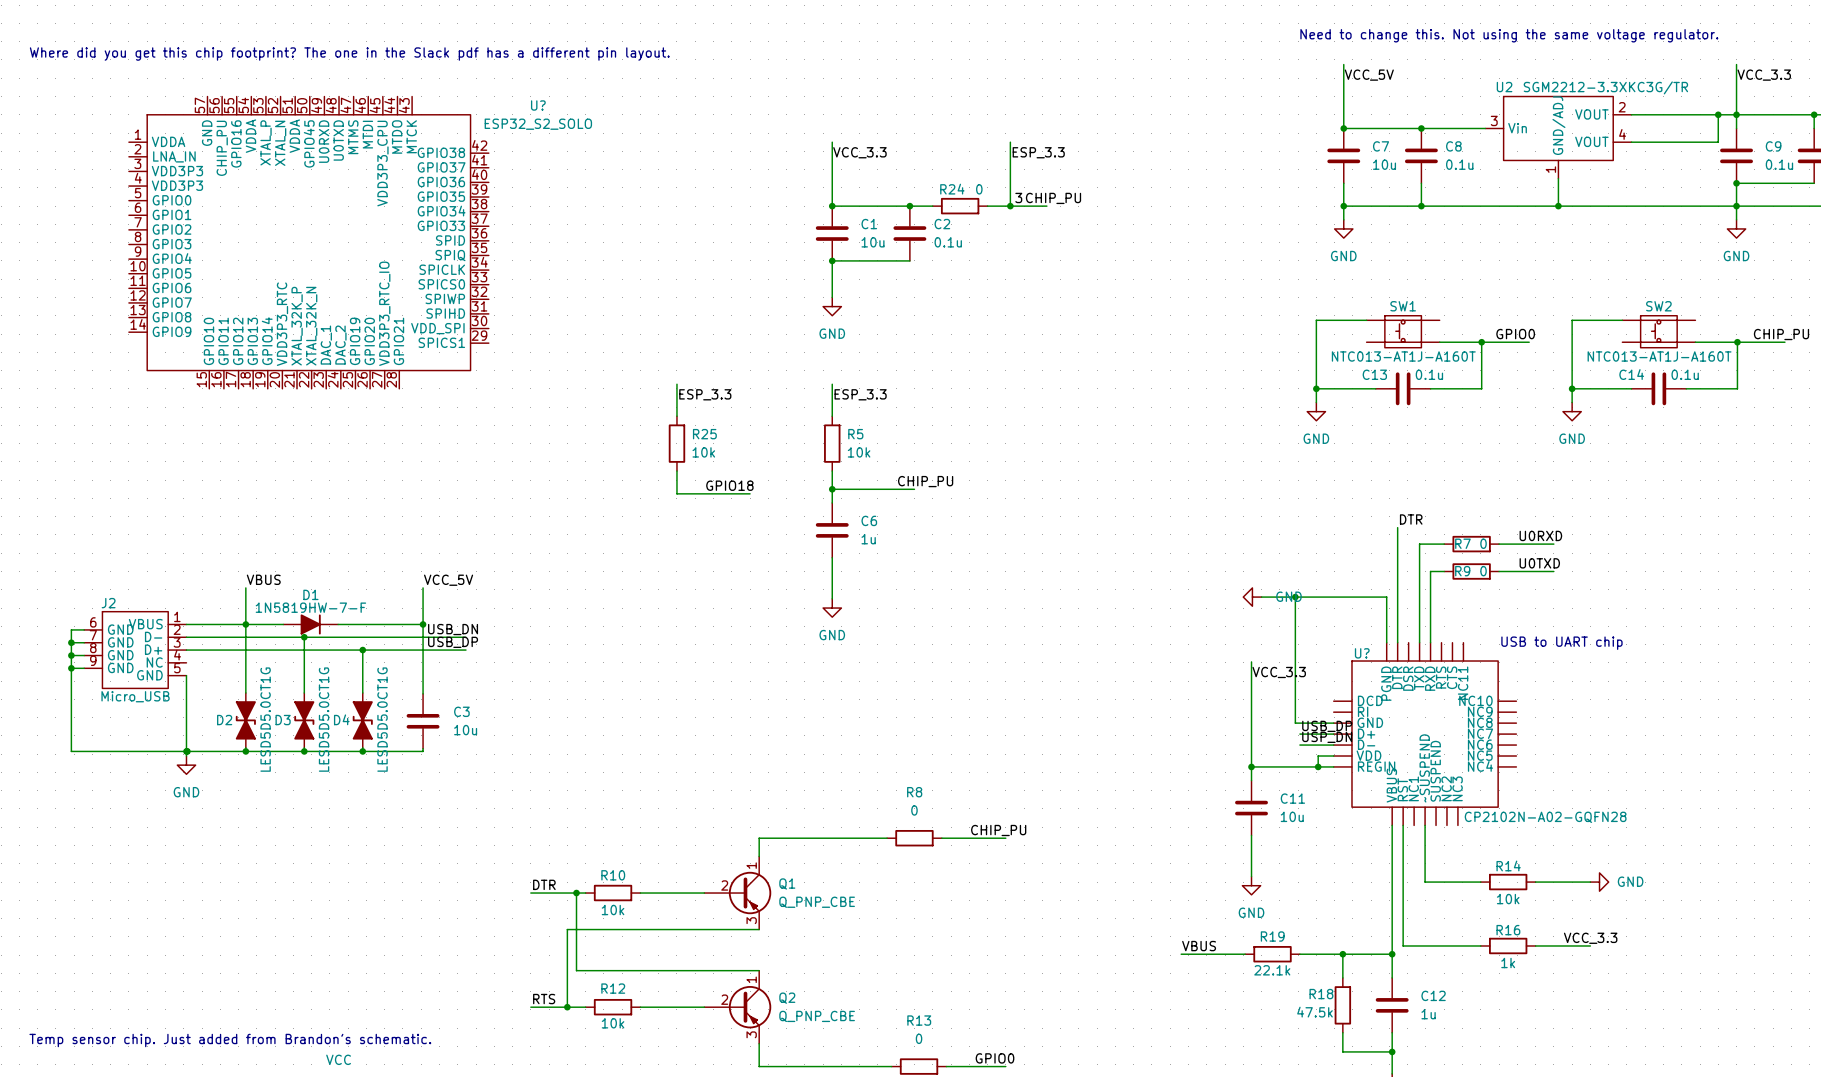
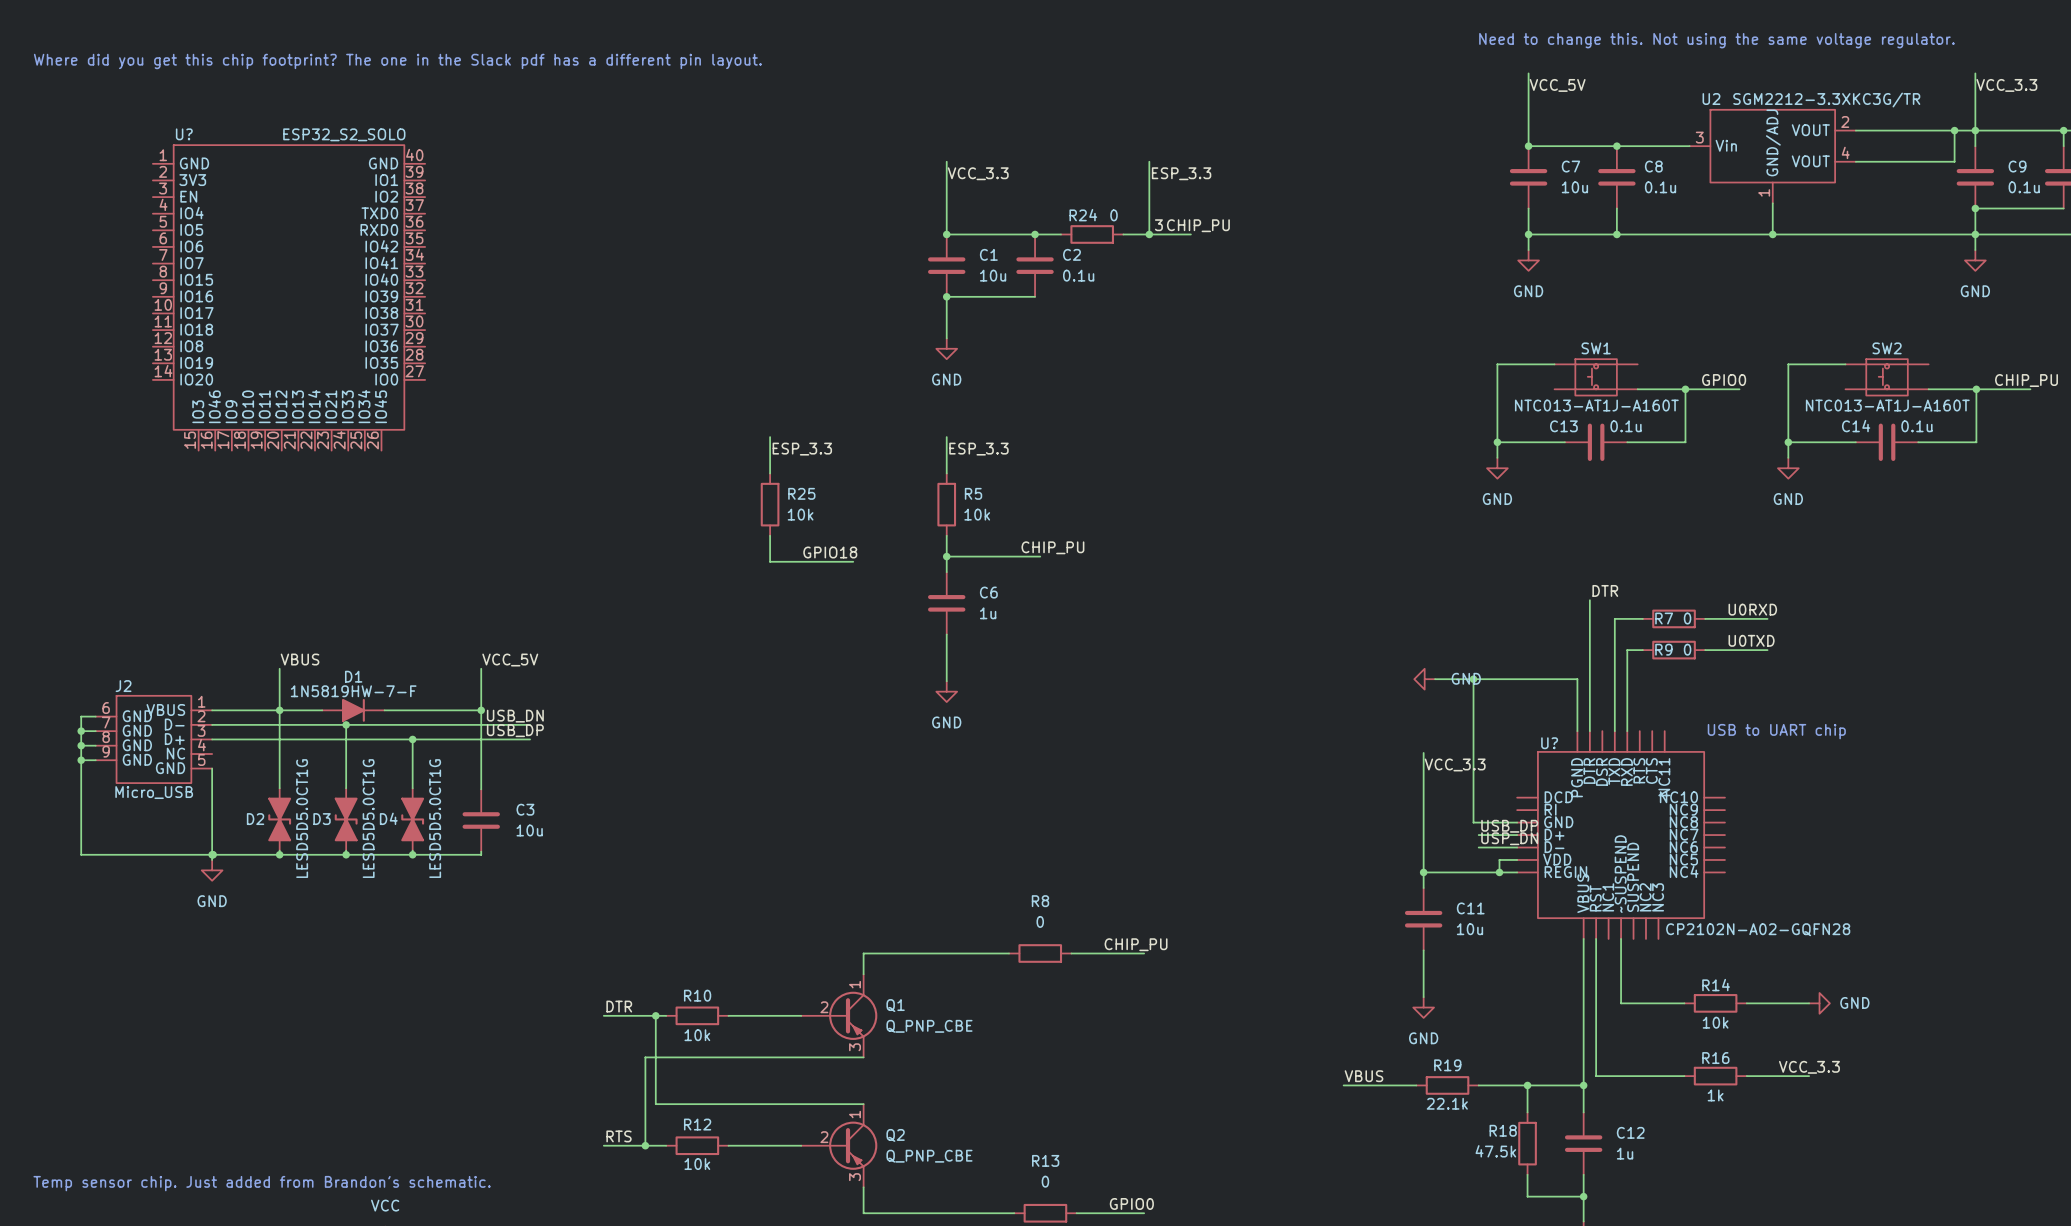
U?: ESP32_S2_SOLO (308, 242) -> none
U?: none -> ESP32_S2_SOLO (289, 297)

